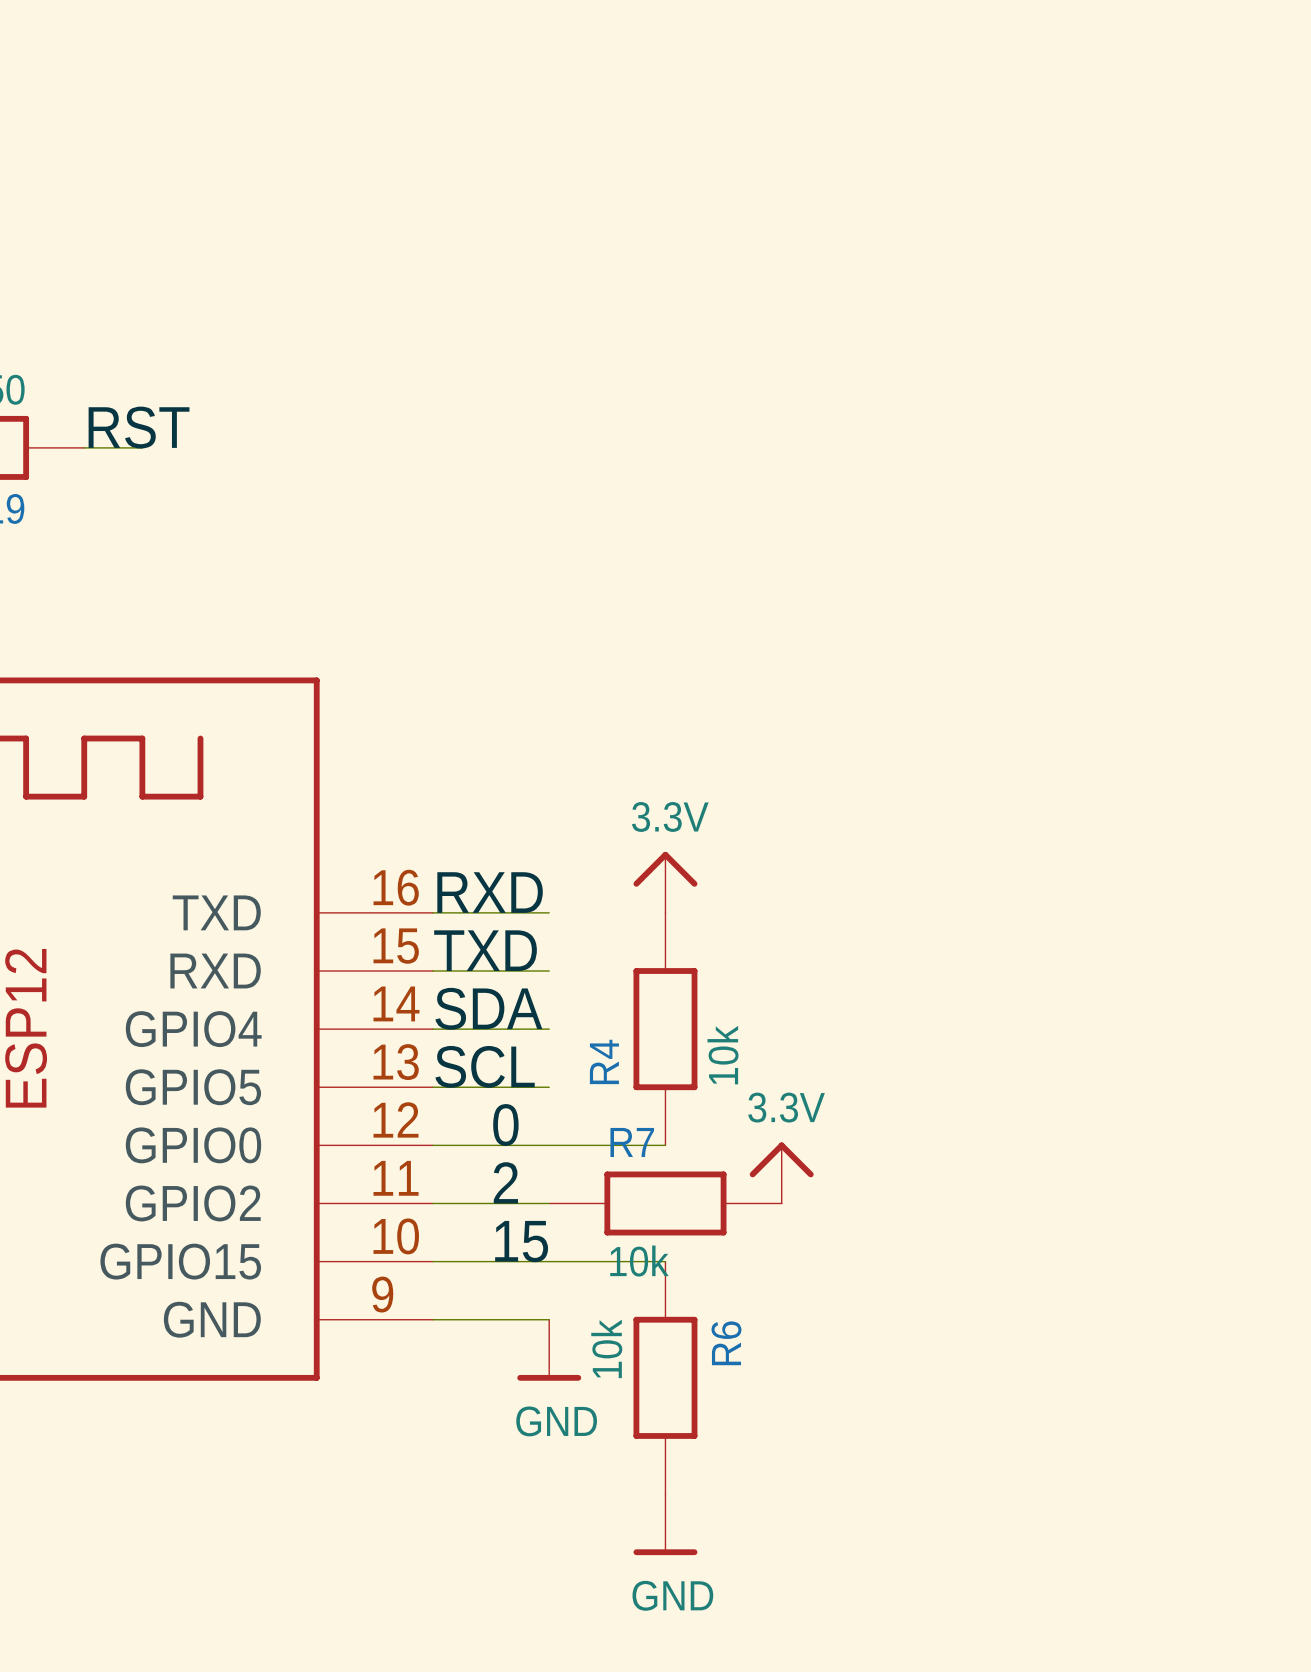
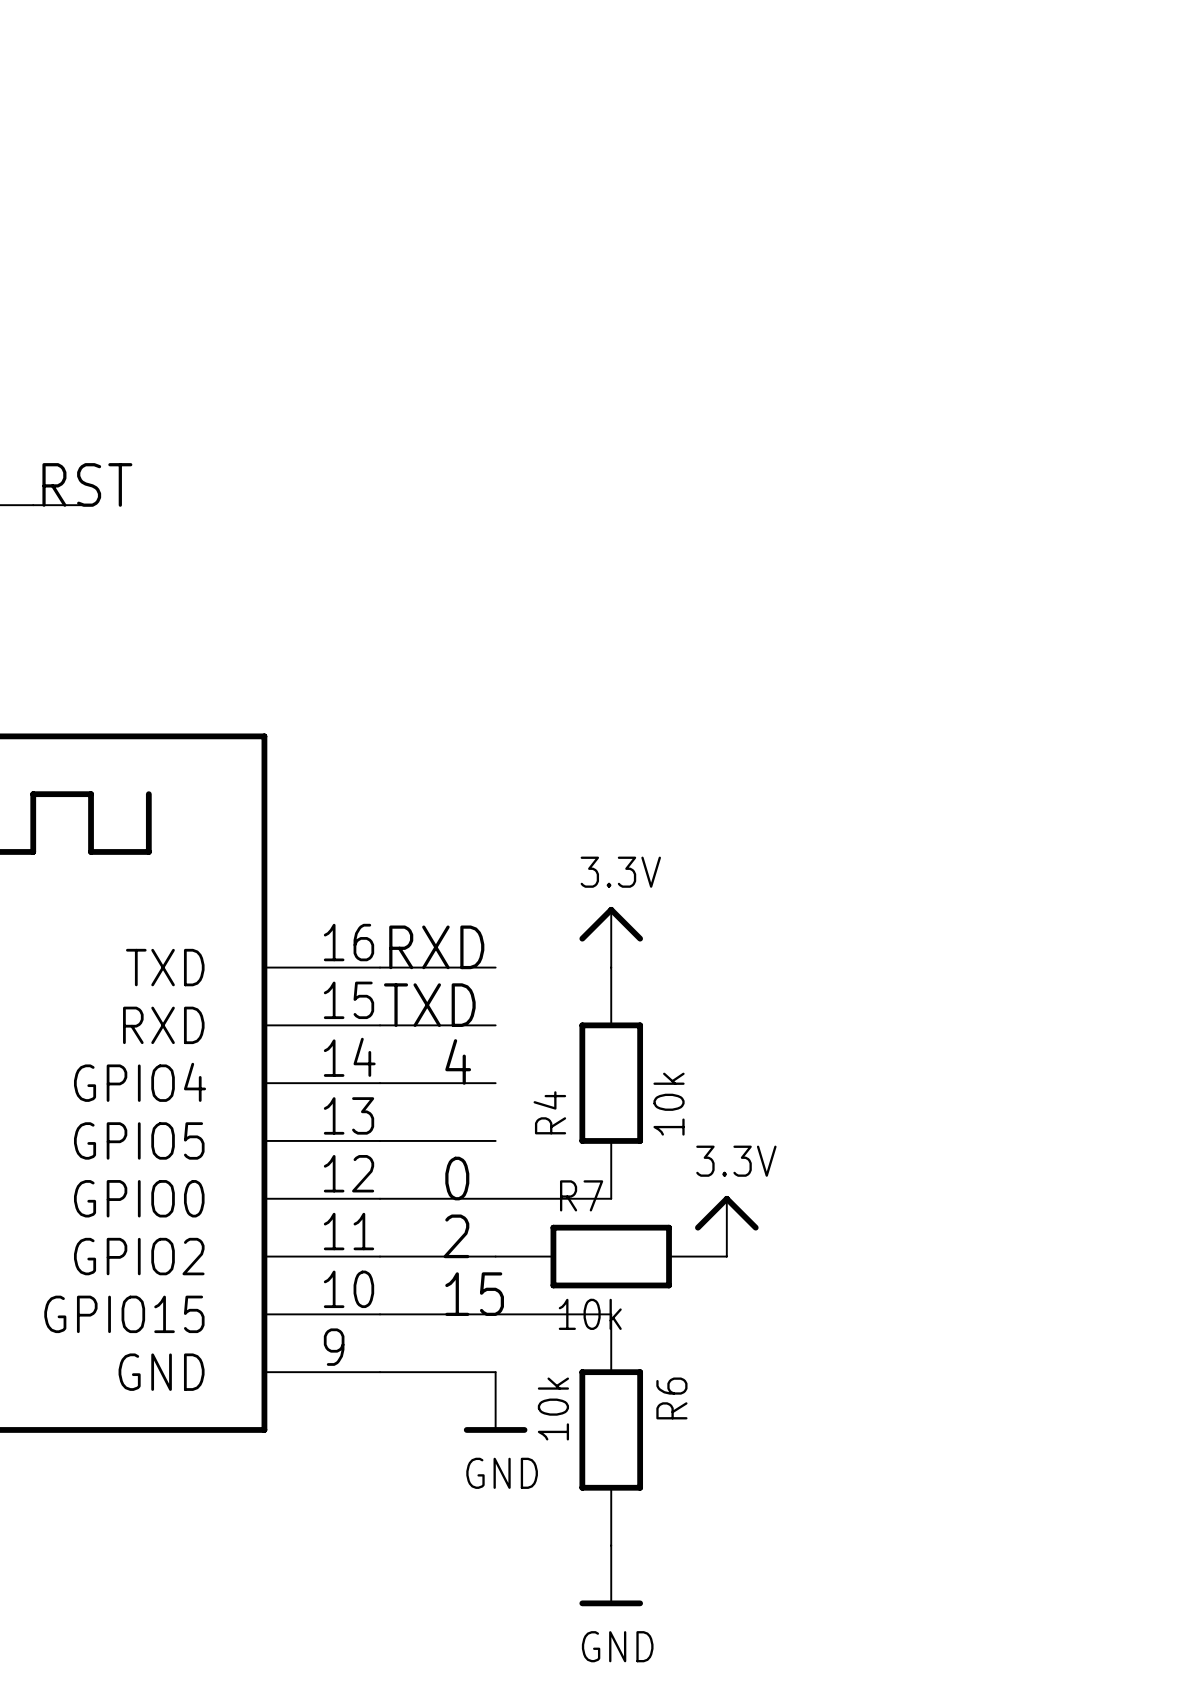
label: SDA (488, 1008) -> none
label: none -> 4 (458, 1061)
label: SCL (485, 1066) -> none

